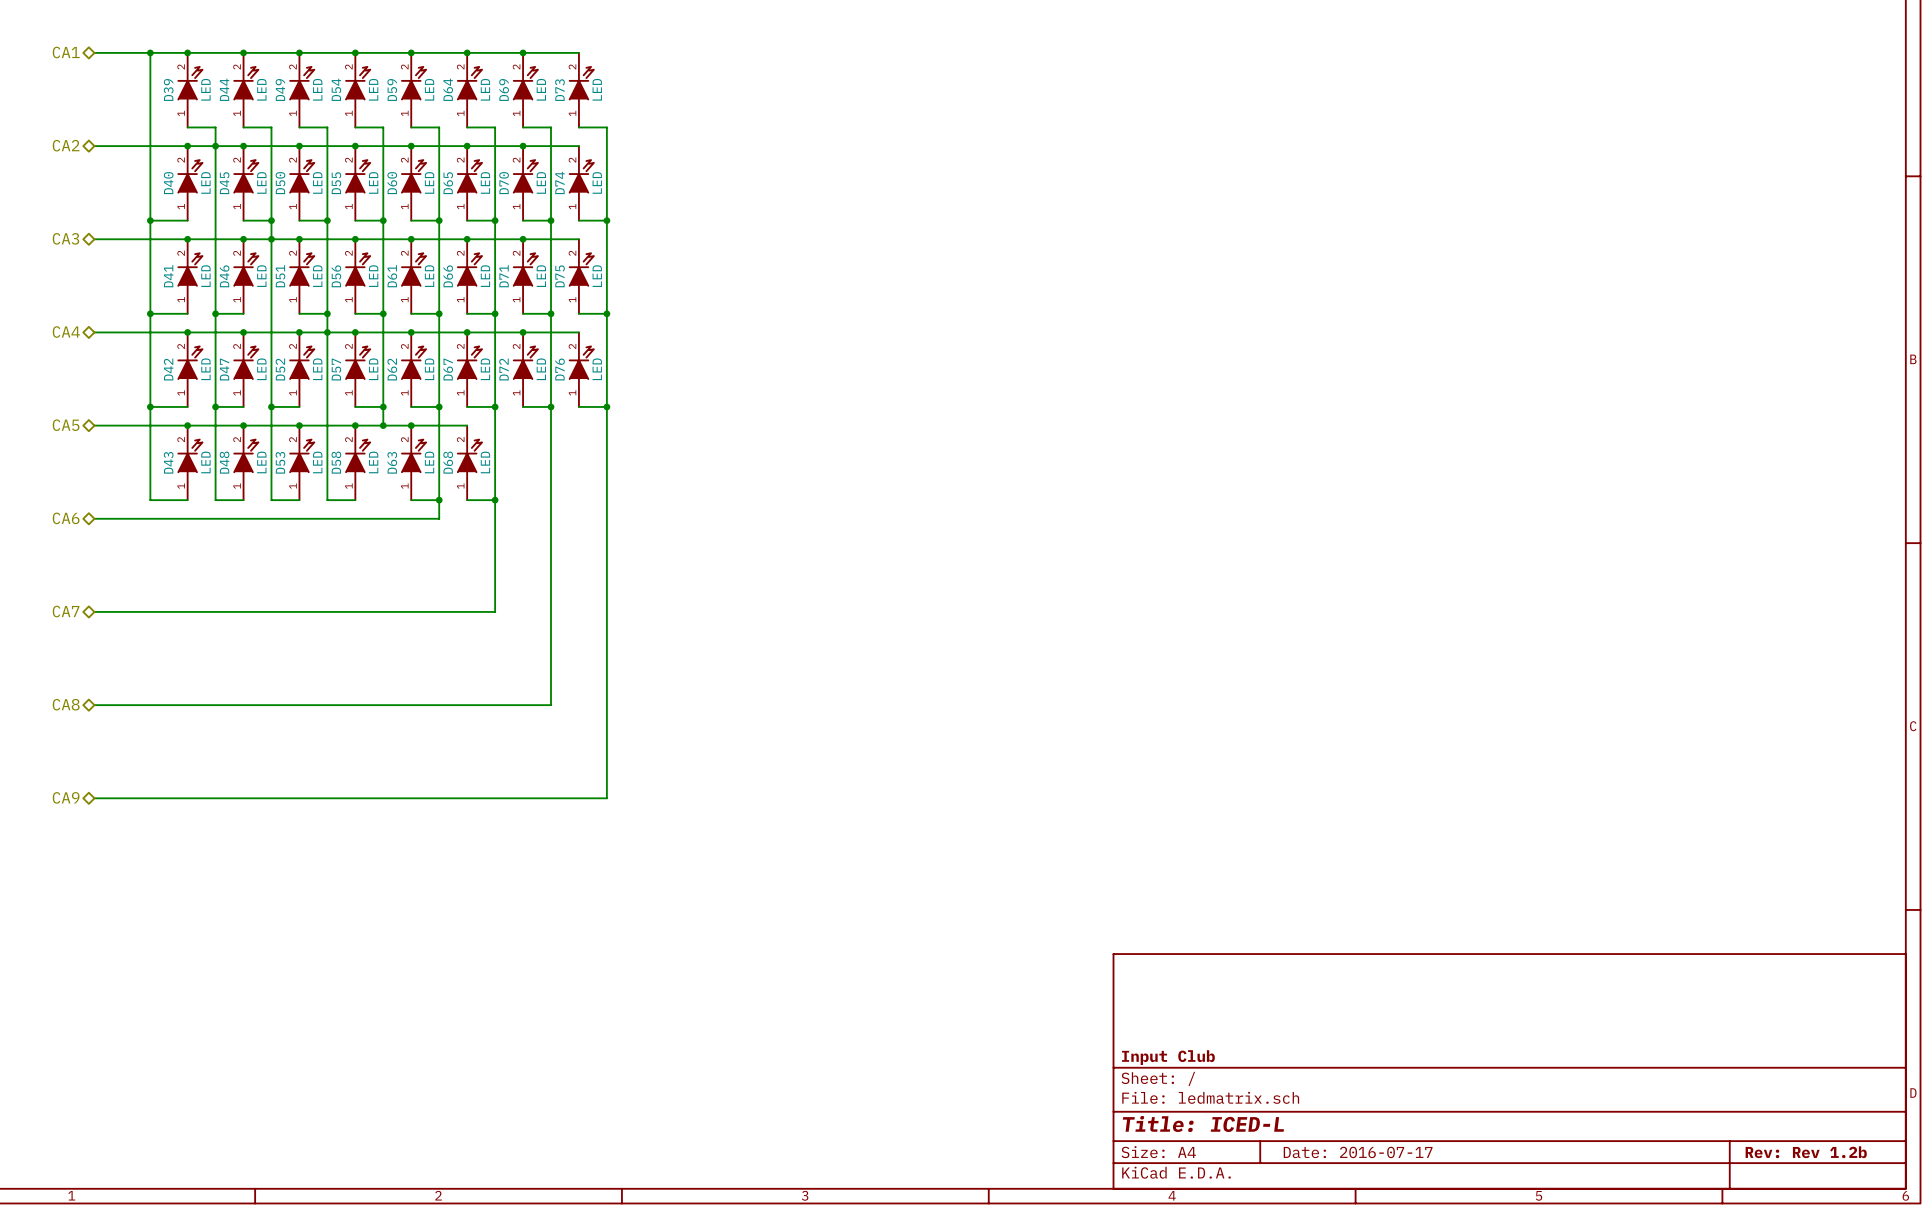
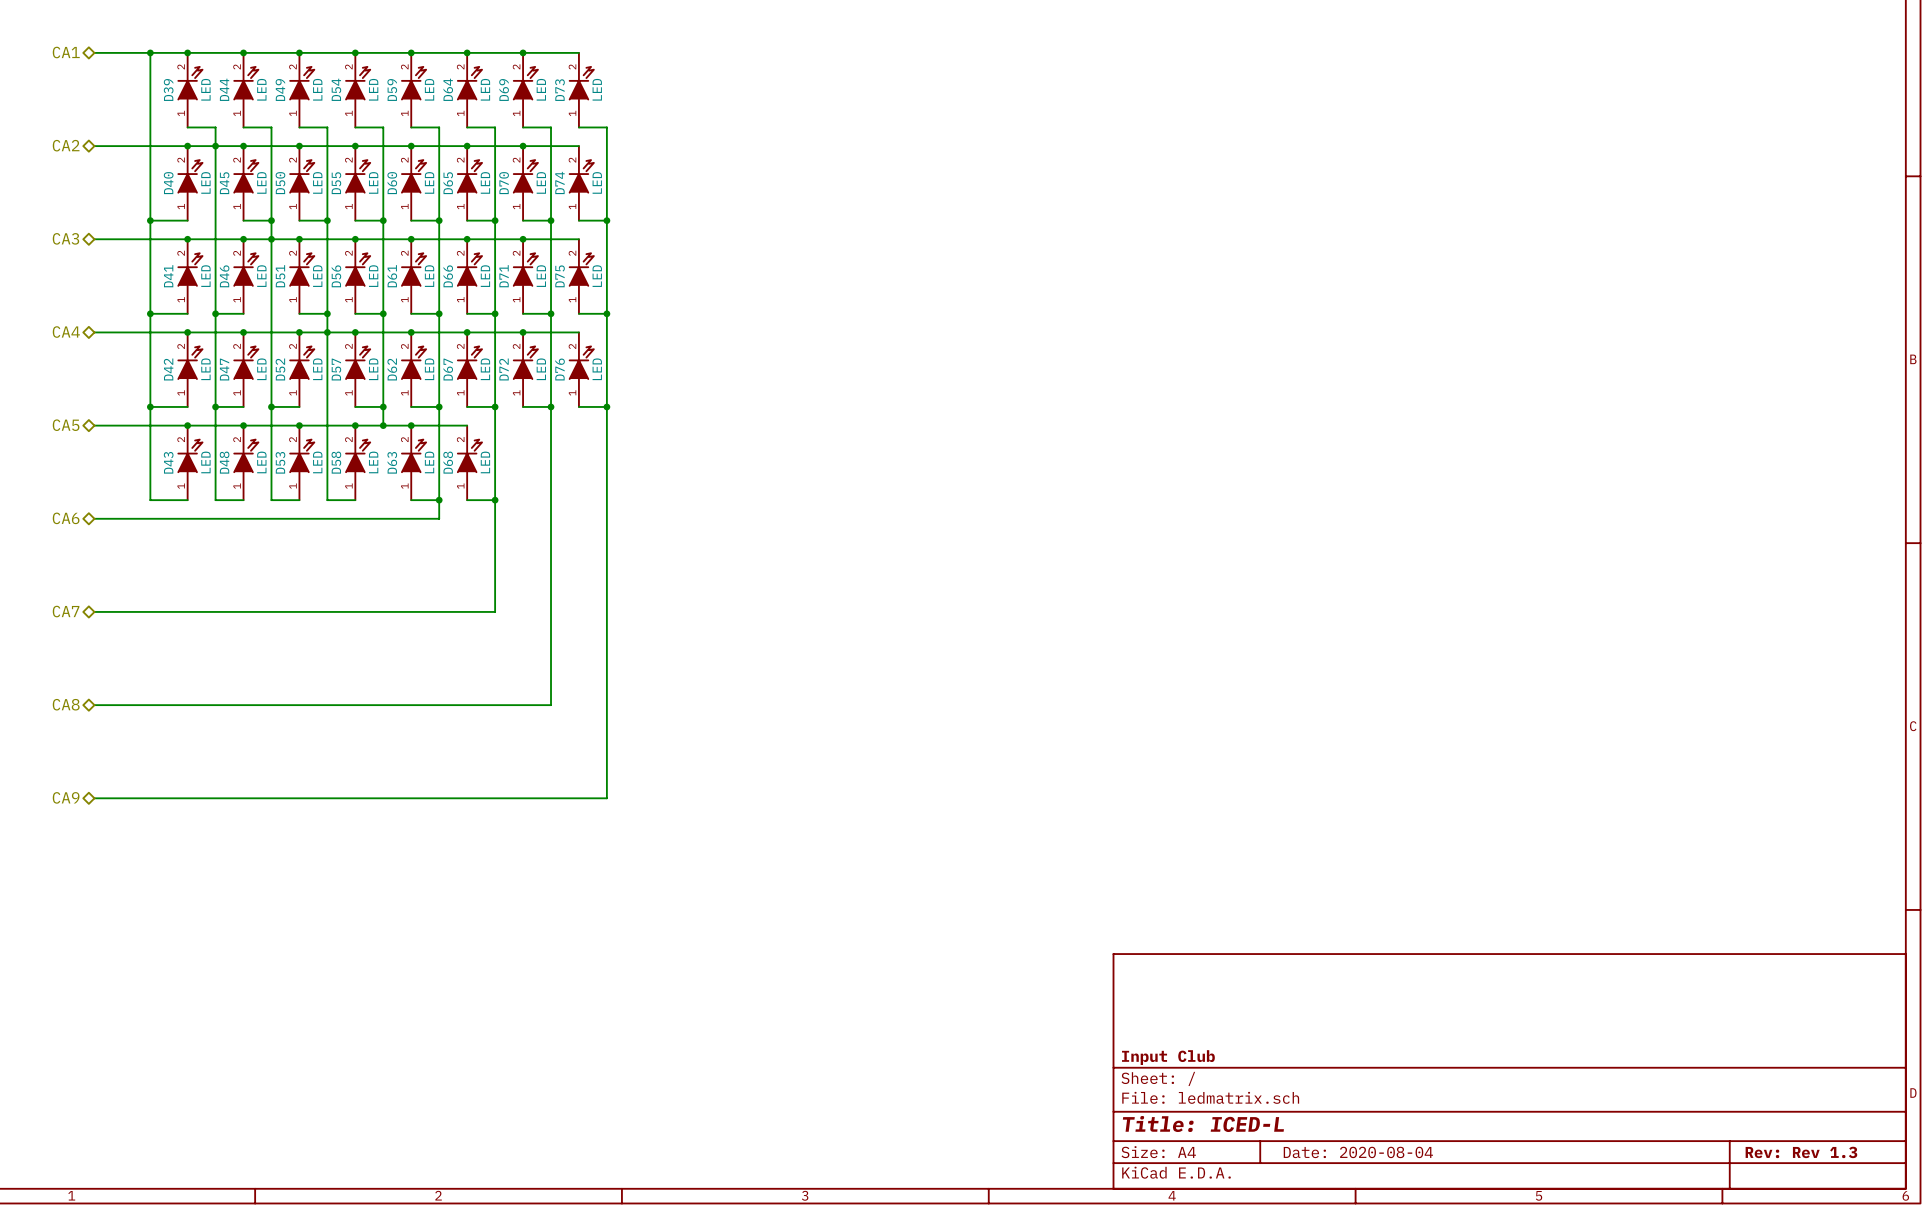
title block: Date: 2016-07-17 (1358, 1152) -> Date: 2020-08-04 (1358, 1152)
title block: Rev: Rev 1.2b (1806, 1152) -> Rev: Rev 1.3 (1801, 1152)

